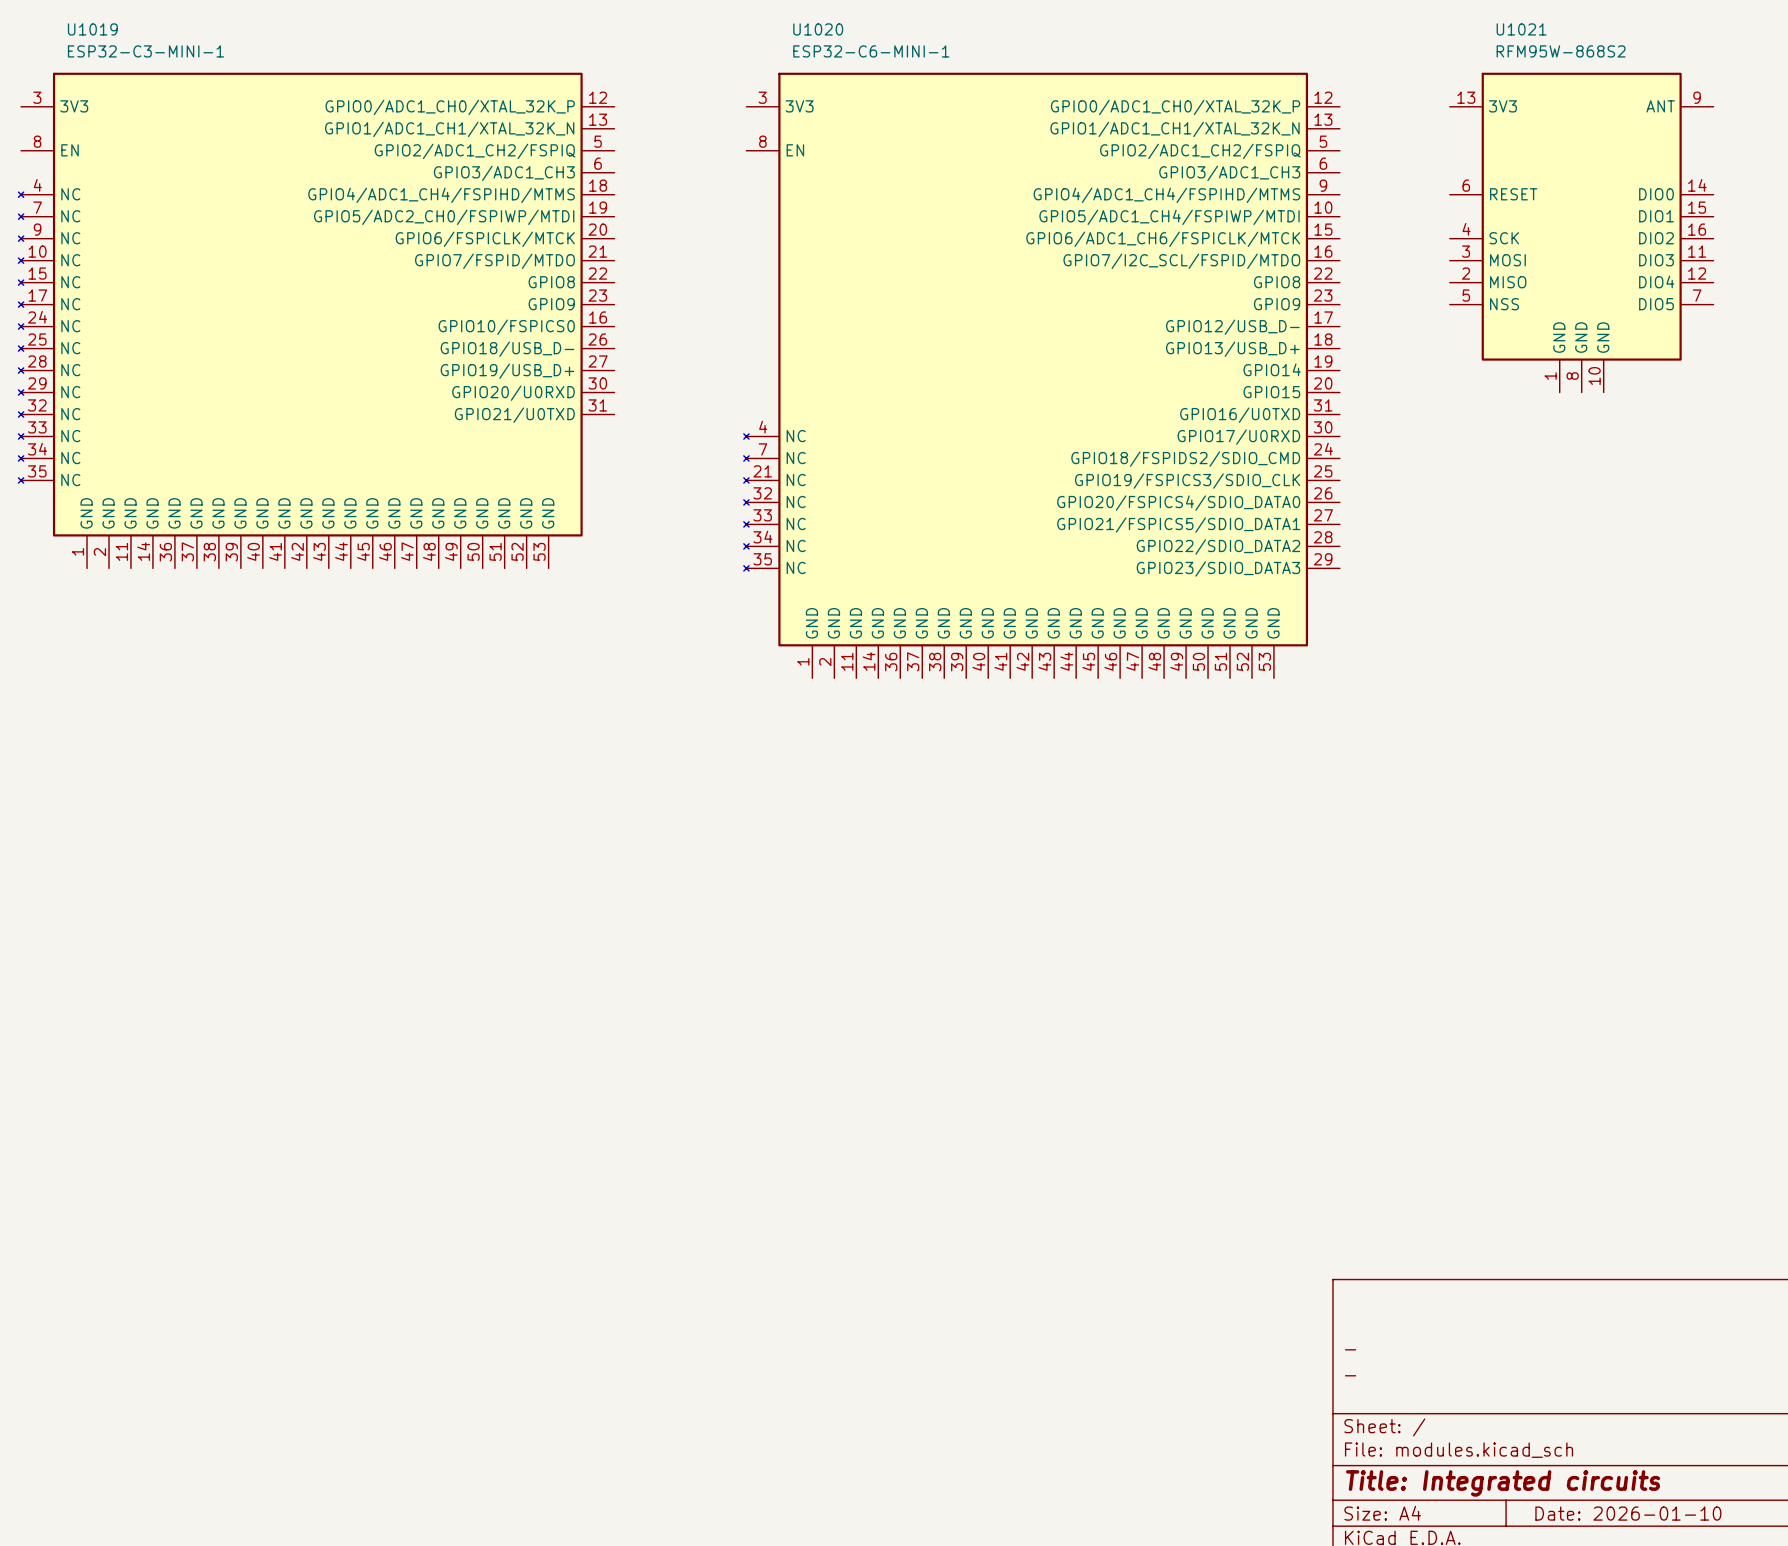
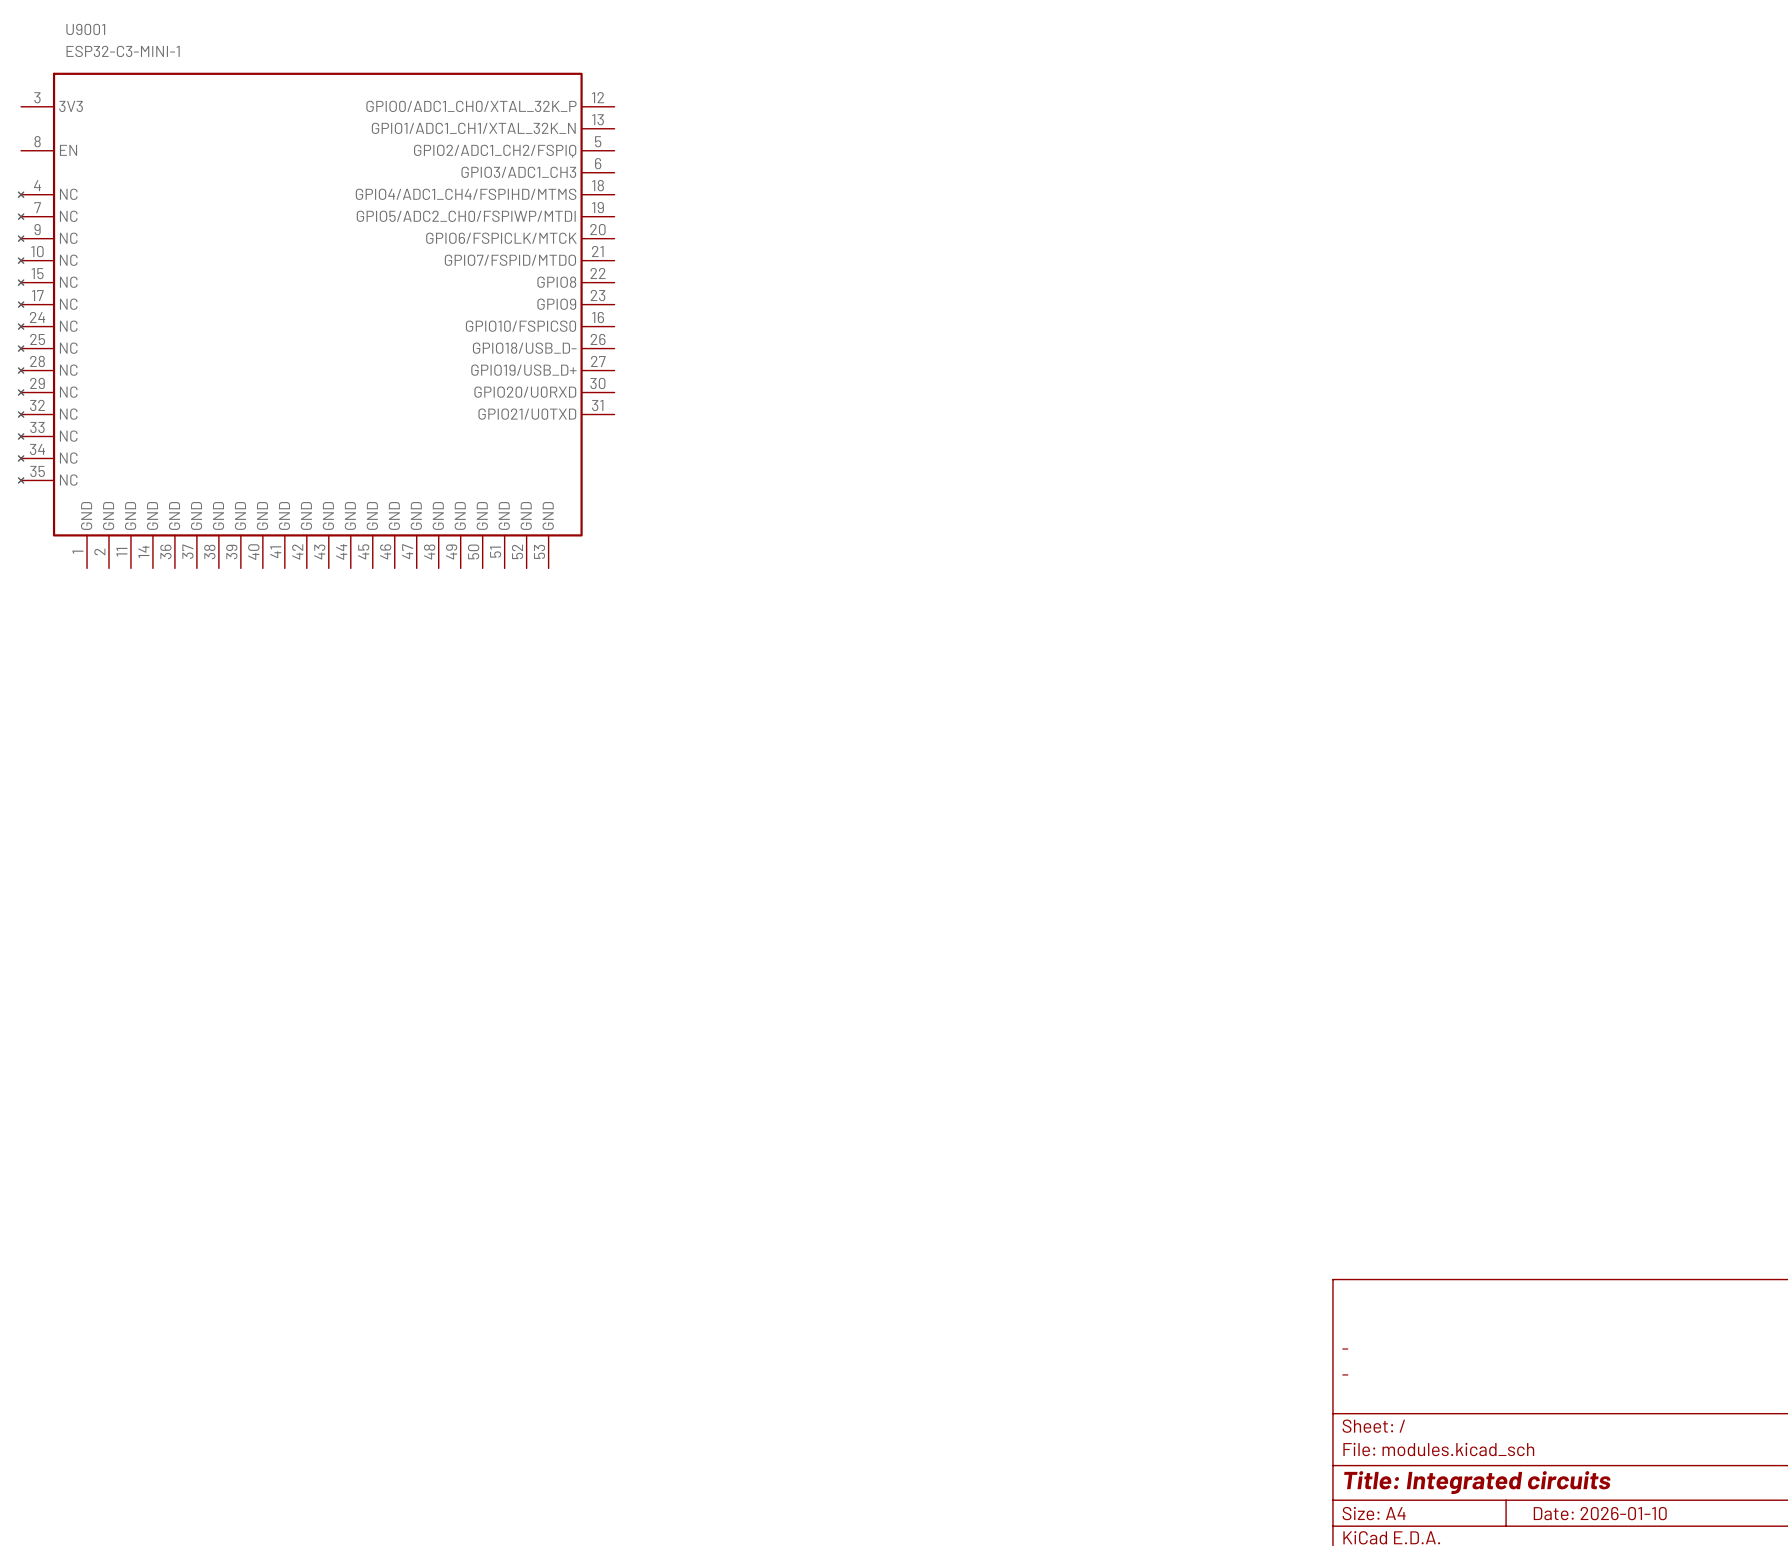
U1019 name: U1019 (92, 29) -> U9001 (85, 29)
U1021: RFM95W-868S2 (1581, 232) -> none
U1020: ESP32-C6-MINI-1 (1041, 375) -> none

